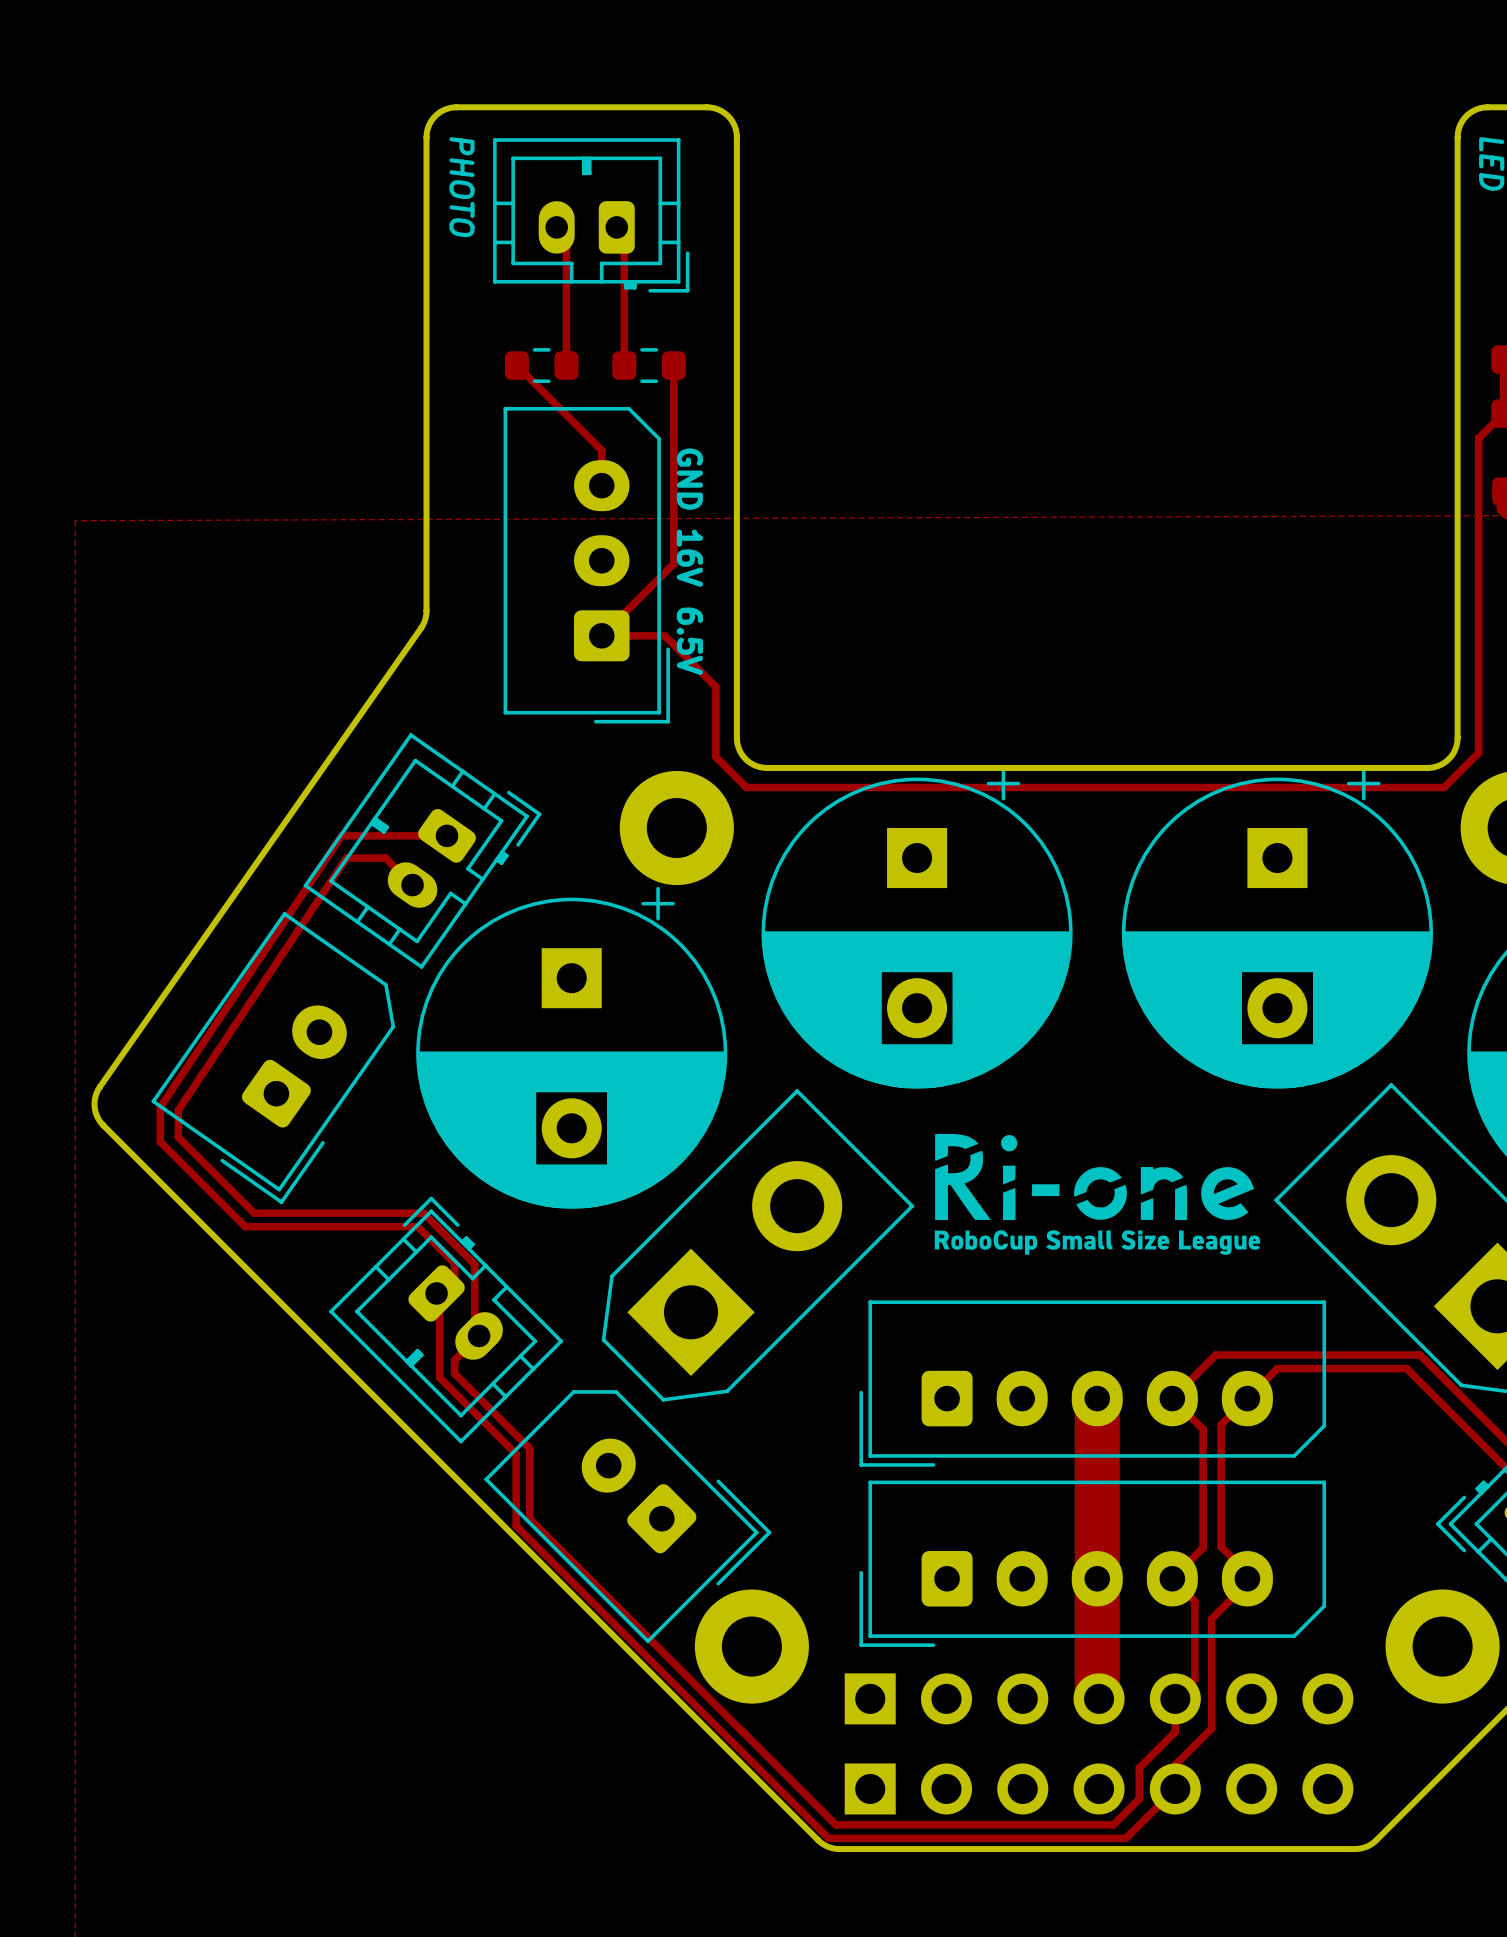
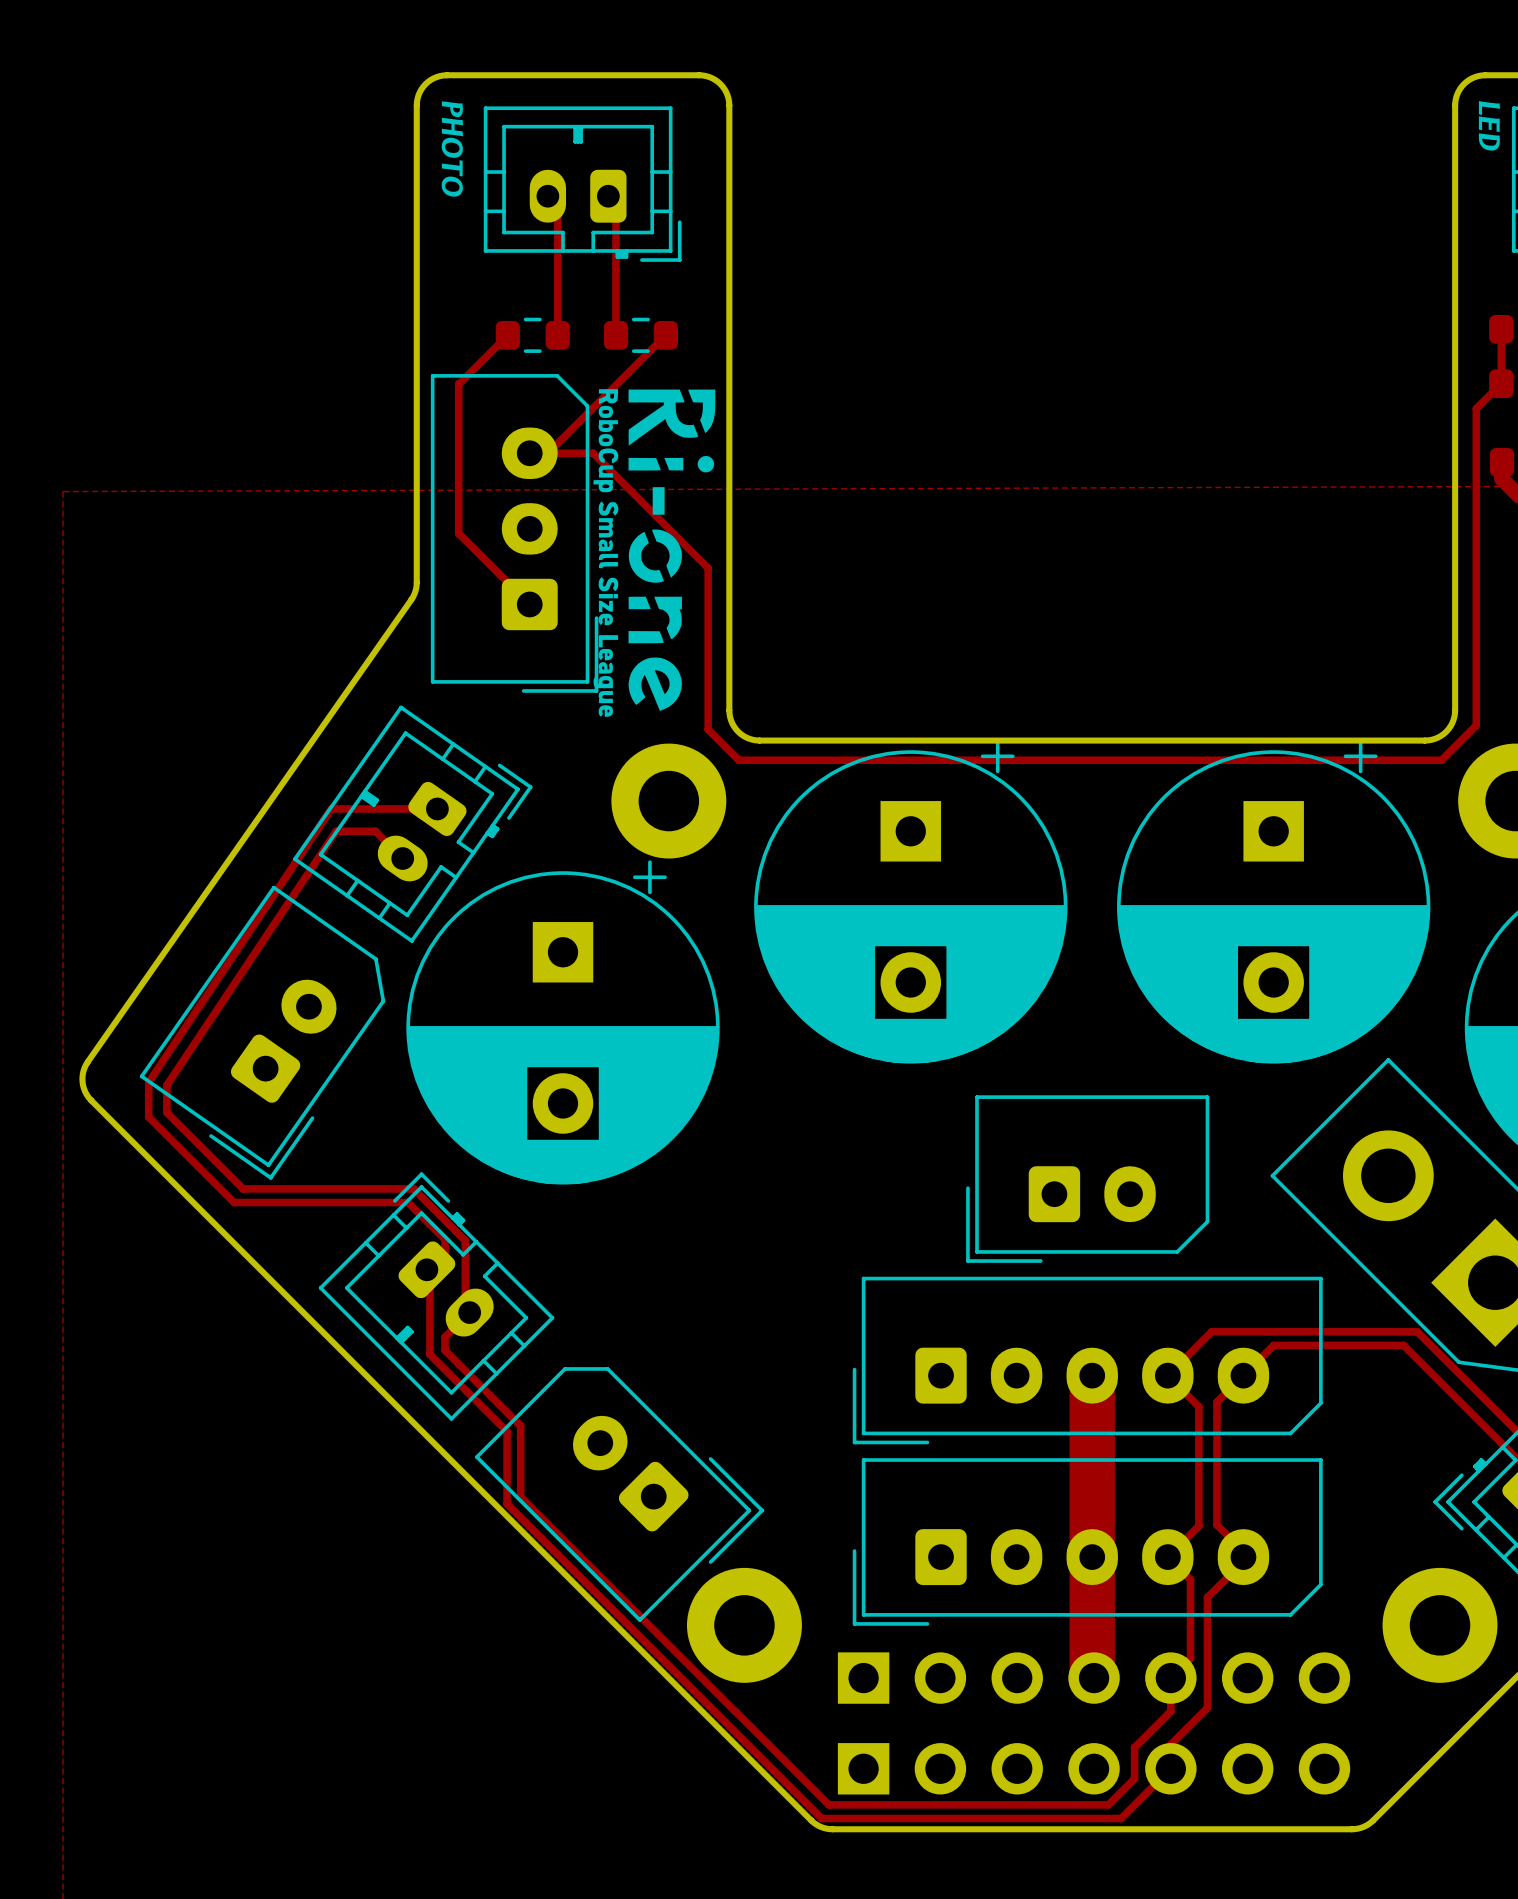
track: (516, 365) (601, 450) (601, 485) -> (507, 335) (458, 383) (458, 533) (529, 604)
track: (673, 365) (673, 563) (601, 635) (664, 635) -> (665, 335) (547, 453)
drawing: none -> [593, 389, 716, 717]
text: GND (689, 479) -> none
text: 16V (689, 558) -> none
part position: (586, 565) -> (514, 533)
track: (666, 637) (715, 686) -> (529, 453) (593, 453) (708, 568) (708, 658)
text: 6.5V (689, 641) -> none
drawing: [934, 1133, 1261, 1255] -> none
part: none -> (1087, 1179)
part: (757, 1245) -> none

